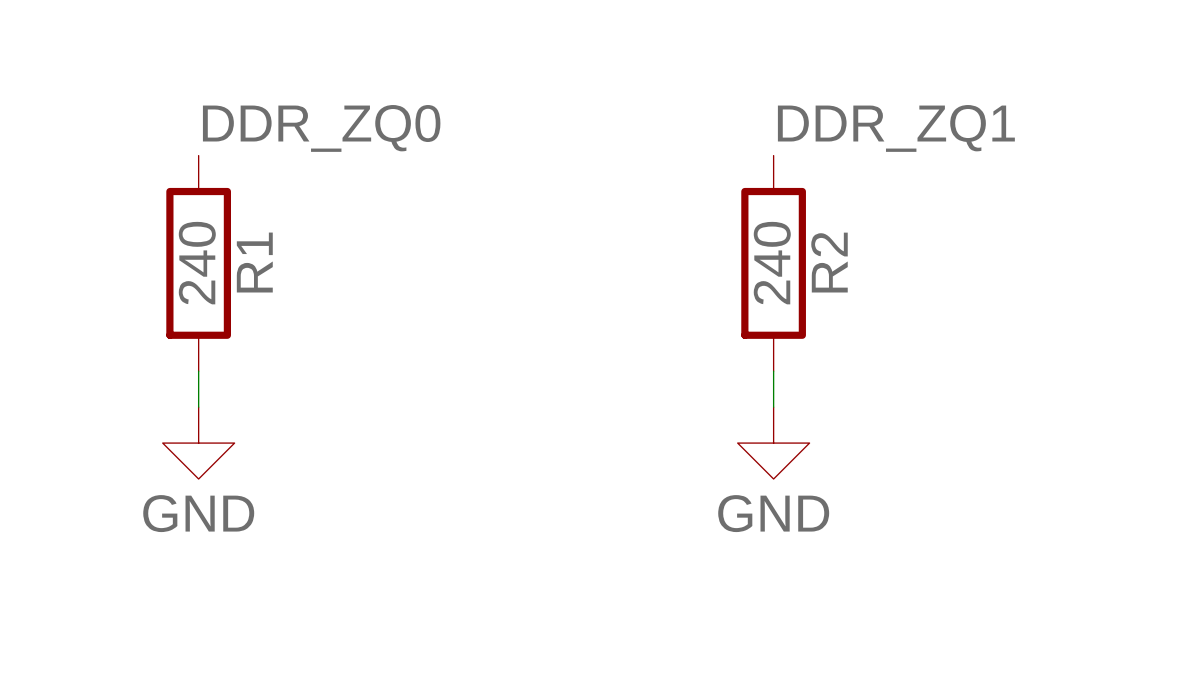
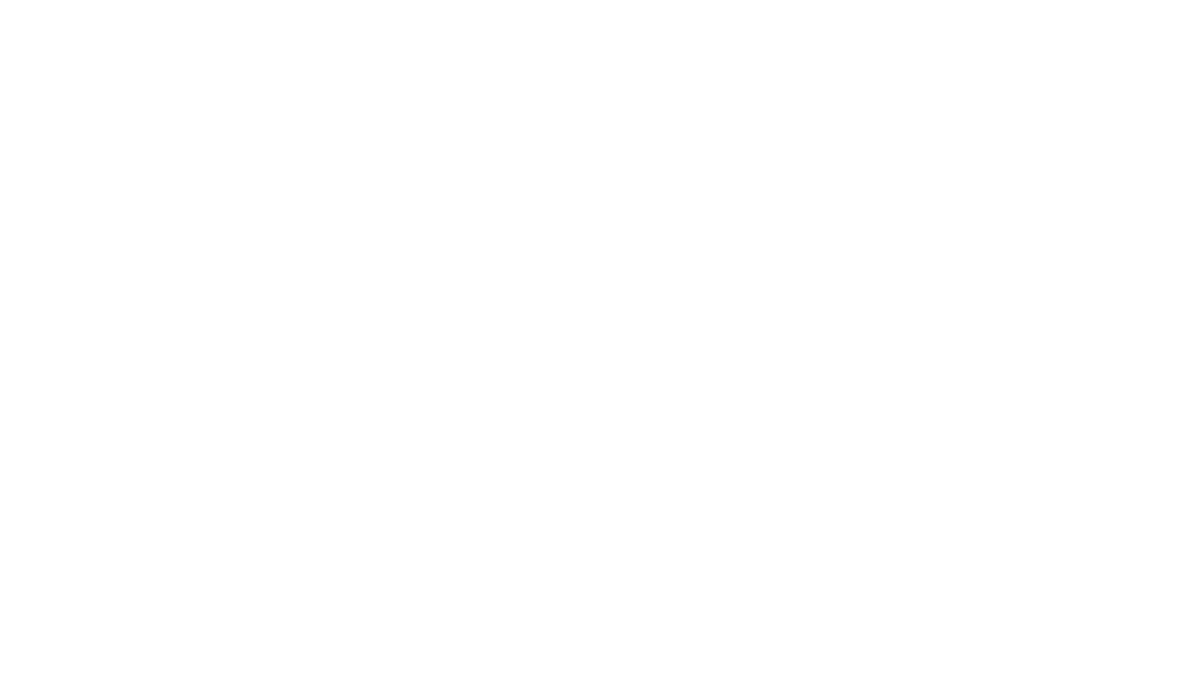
label: DDR_ZQ0 (321, 128) -> none
label: DDR_ZQ1 (896, 128) -> none
R1: 240 (198, 263) -> none
R2: 240 (773, 263) -> none
wire: (198, 371) (198, 407) -> none
wire: (773, 371) (773, 407) -> none
power symbol: GND (198, 443) -> none
power symbol: GND (773, 443) -> none

